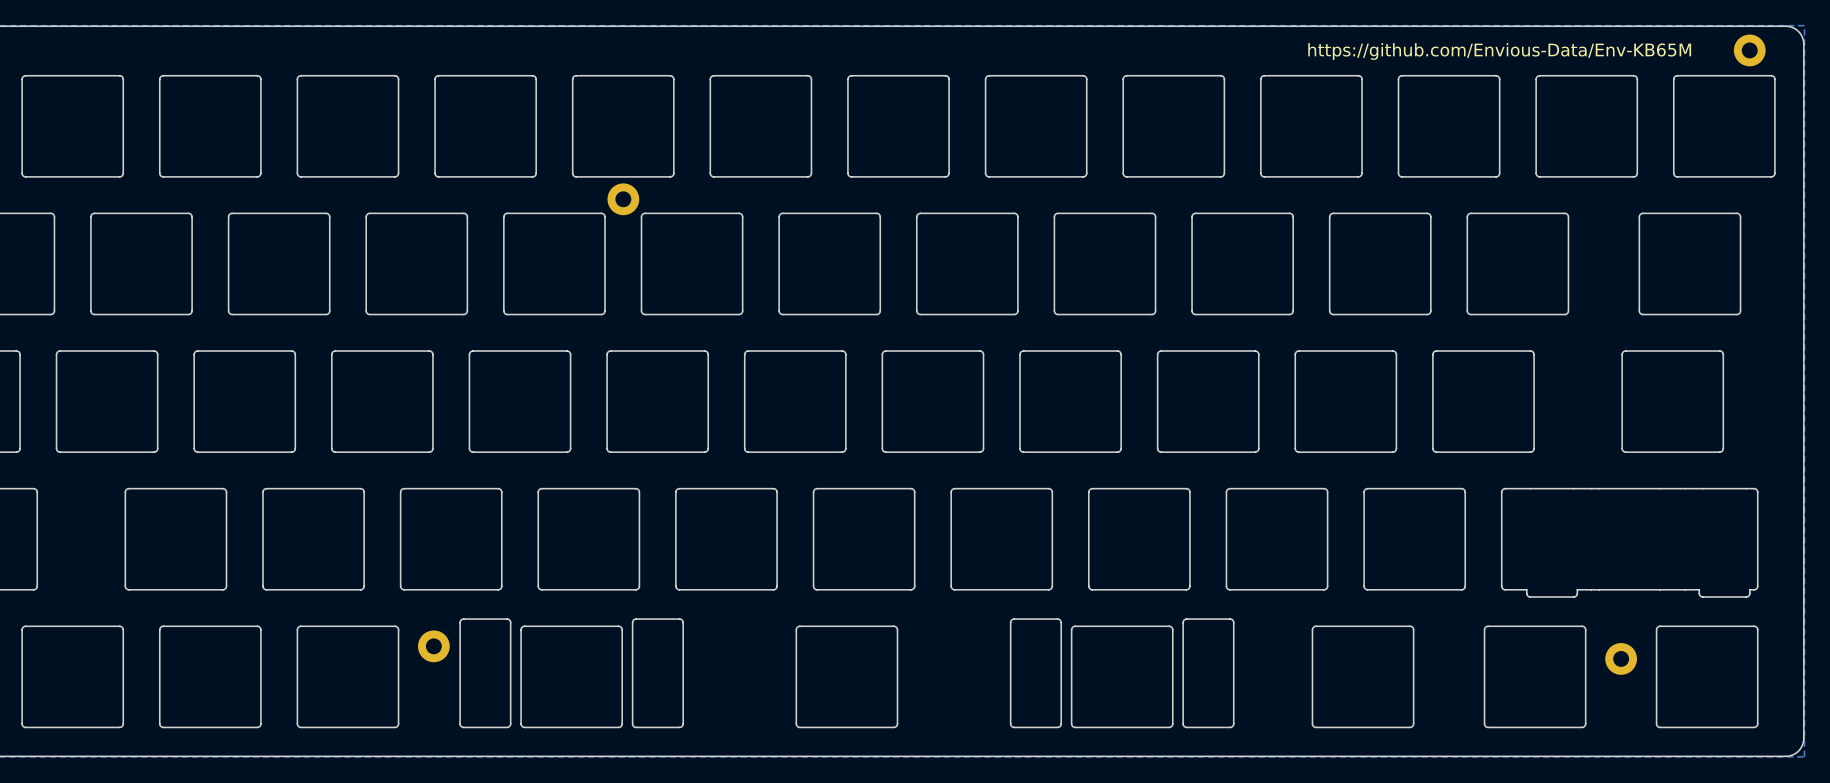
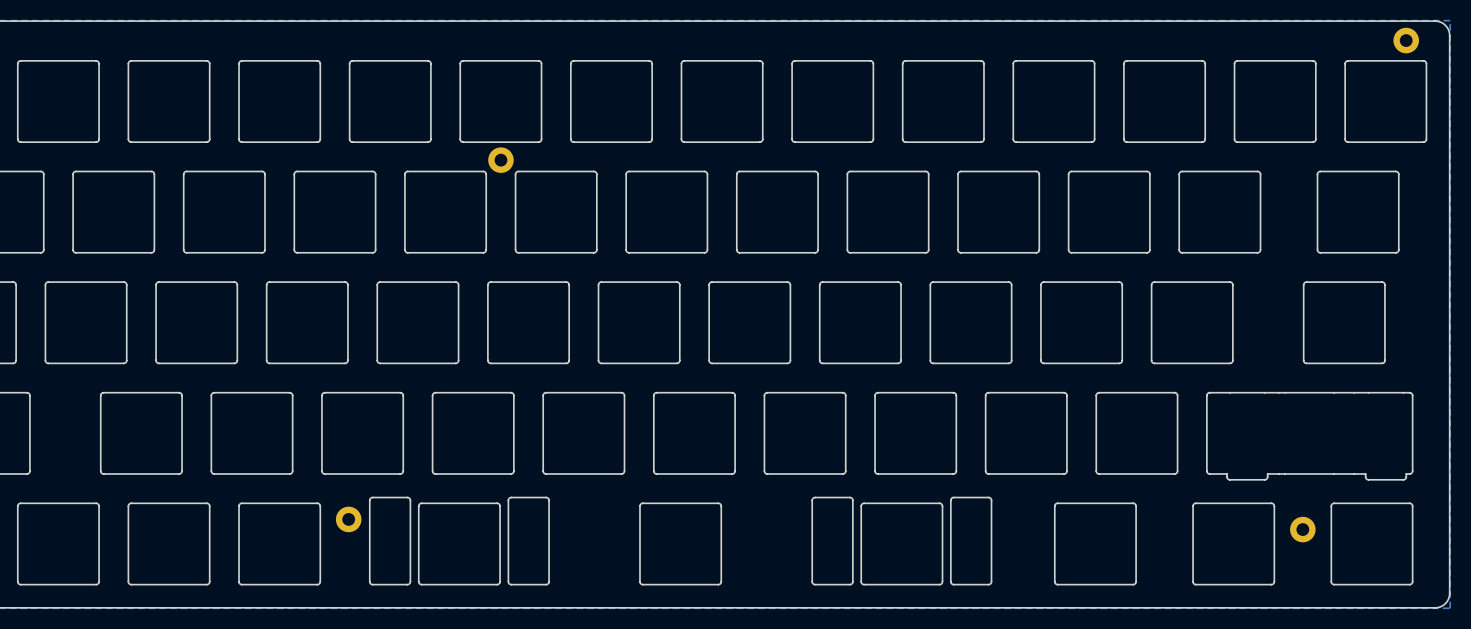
text: https://github.com/Envious-Data/Env-KB65M (1499, 51) -> none

